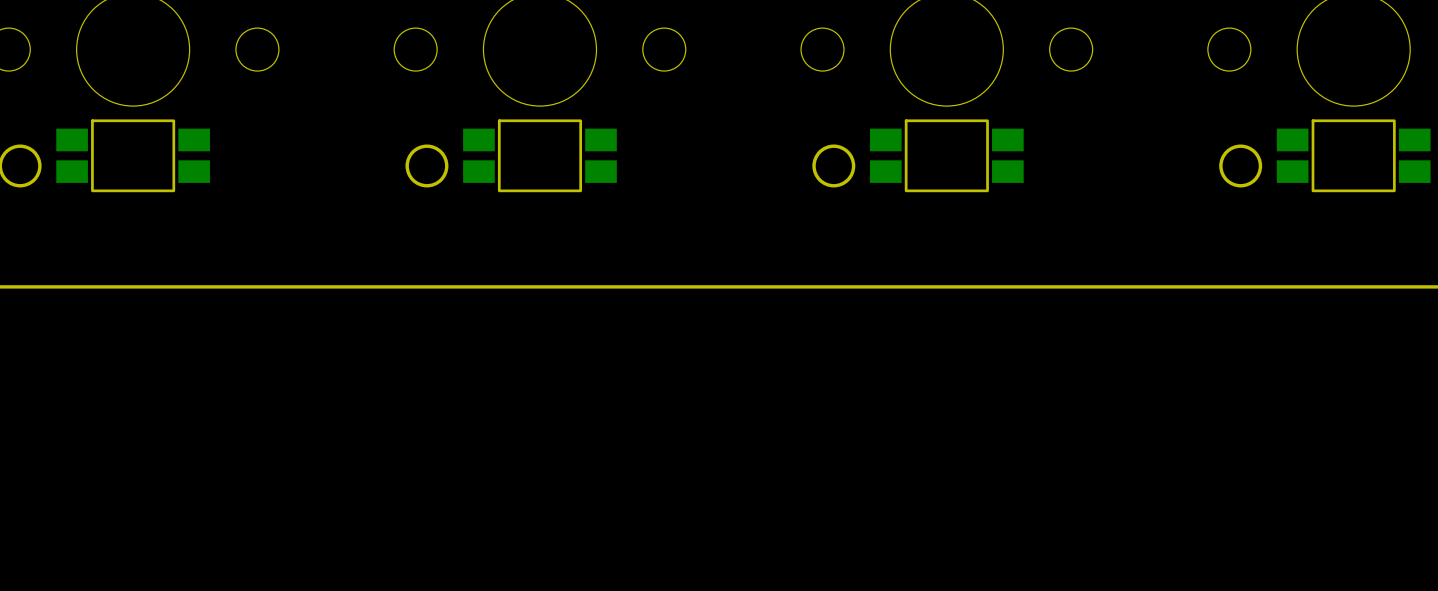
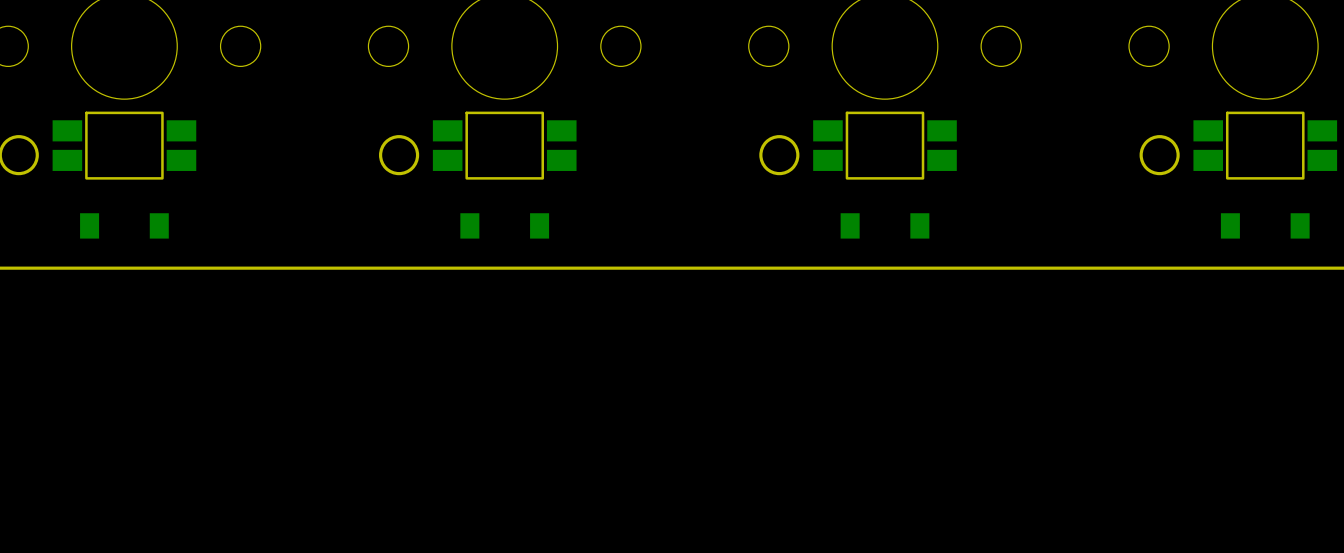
part: none -> (124, 225)
part: none -> (504, 225)
part: none -> (884, 225)
part: none -> (1265, 225)

